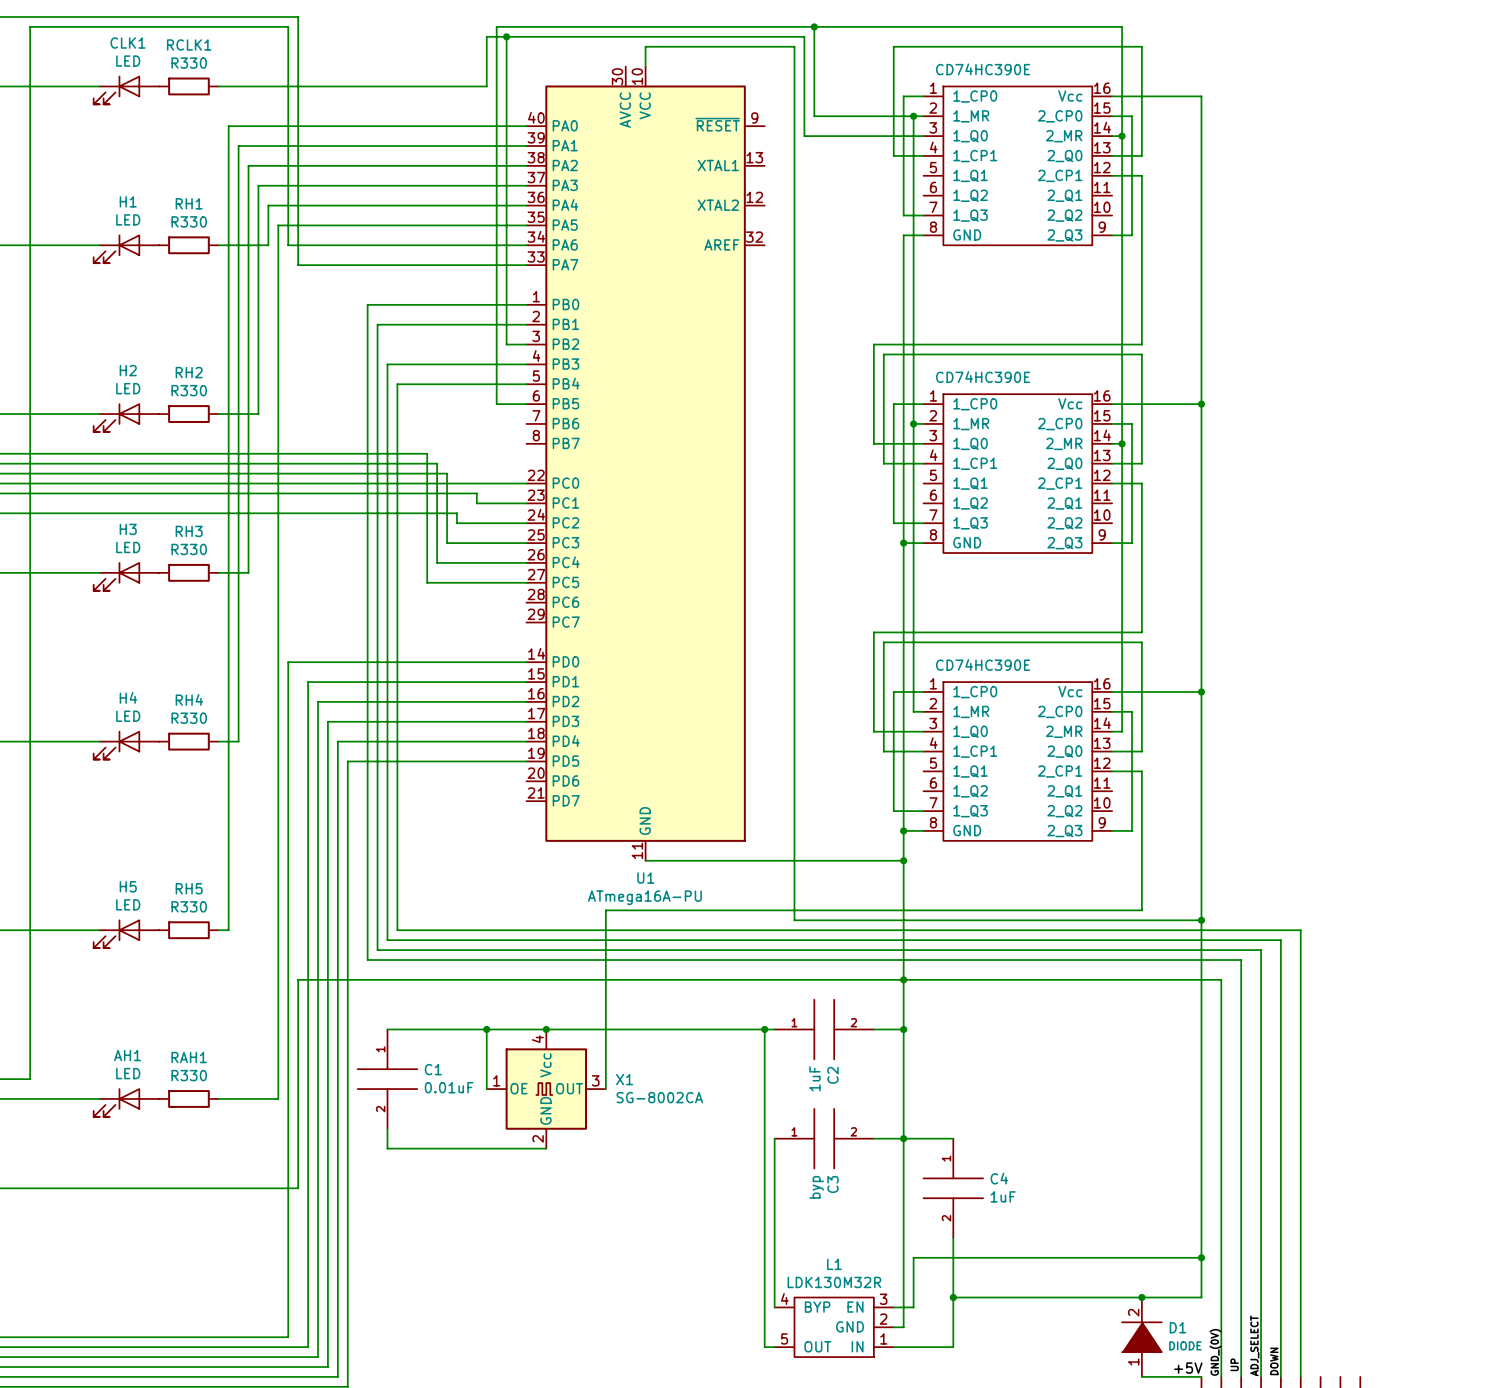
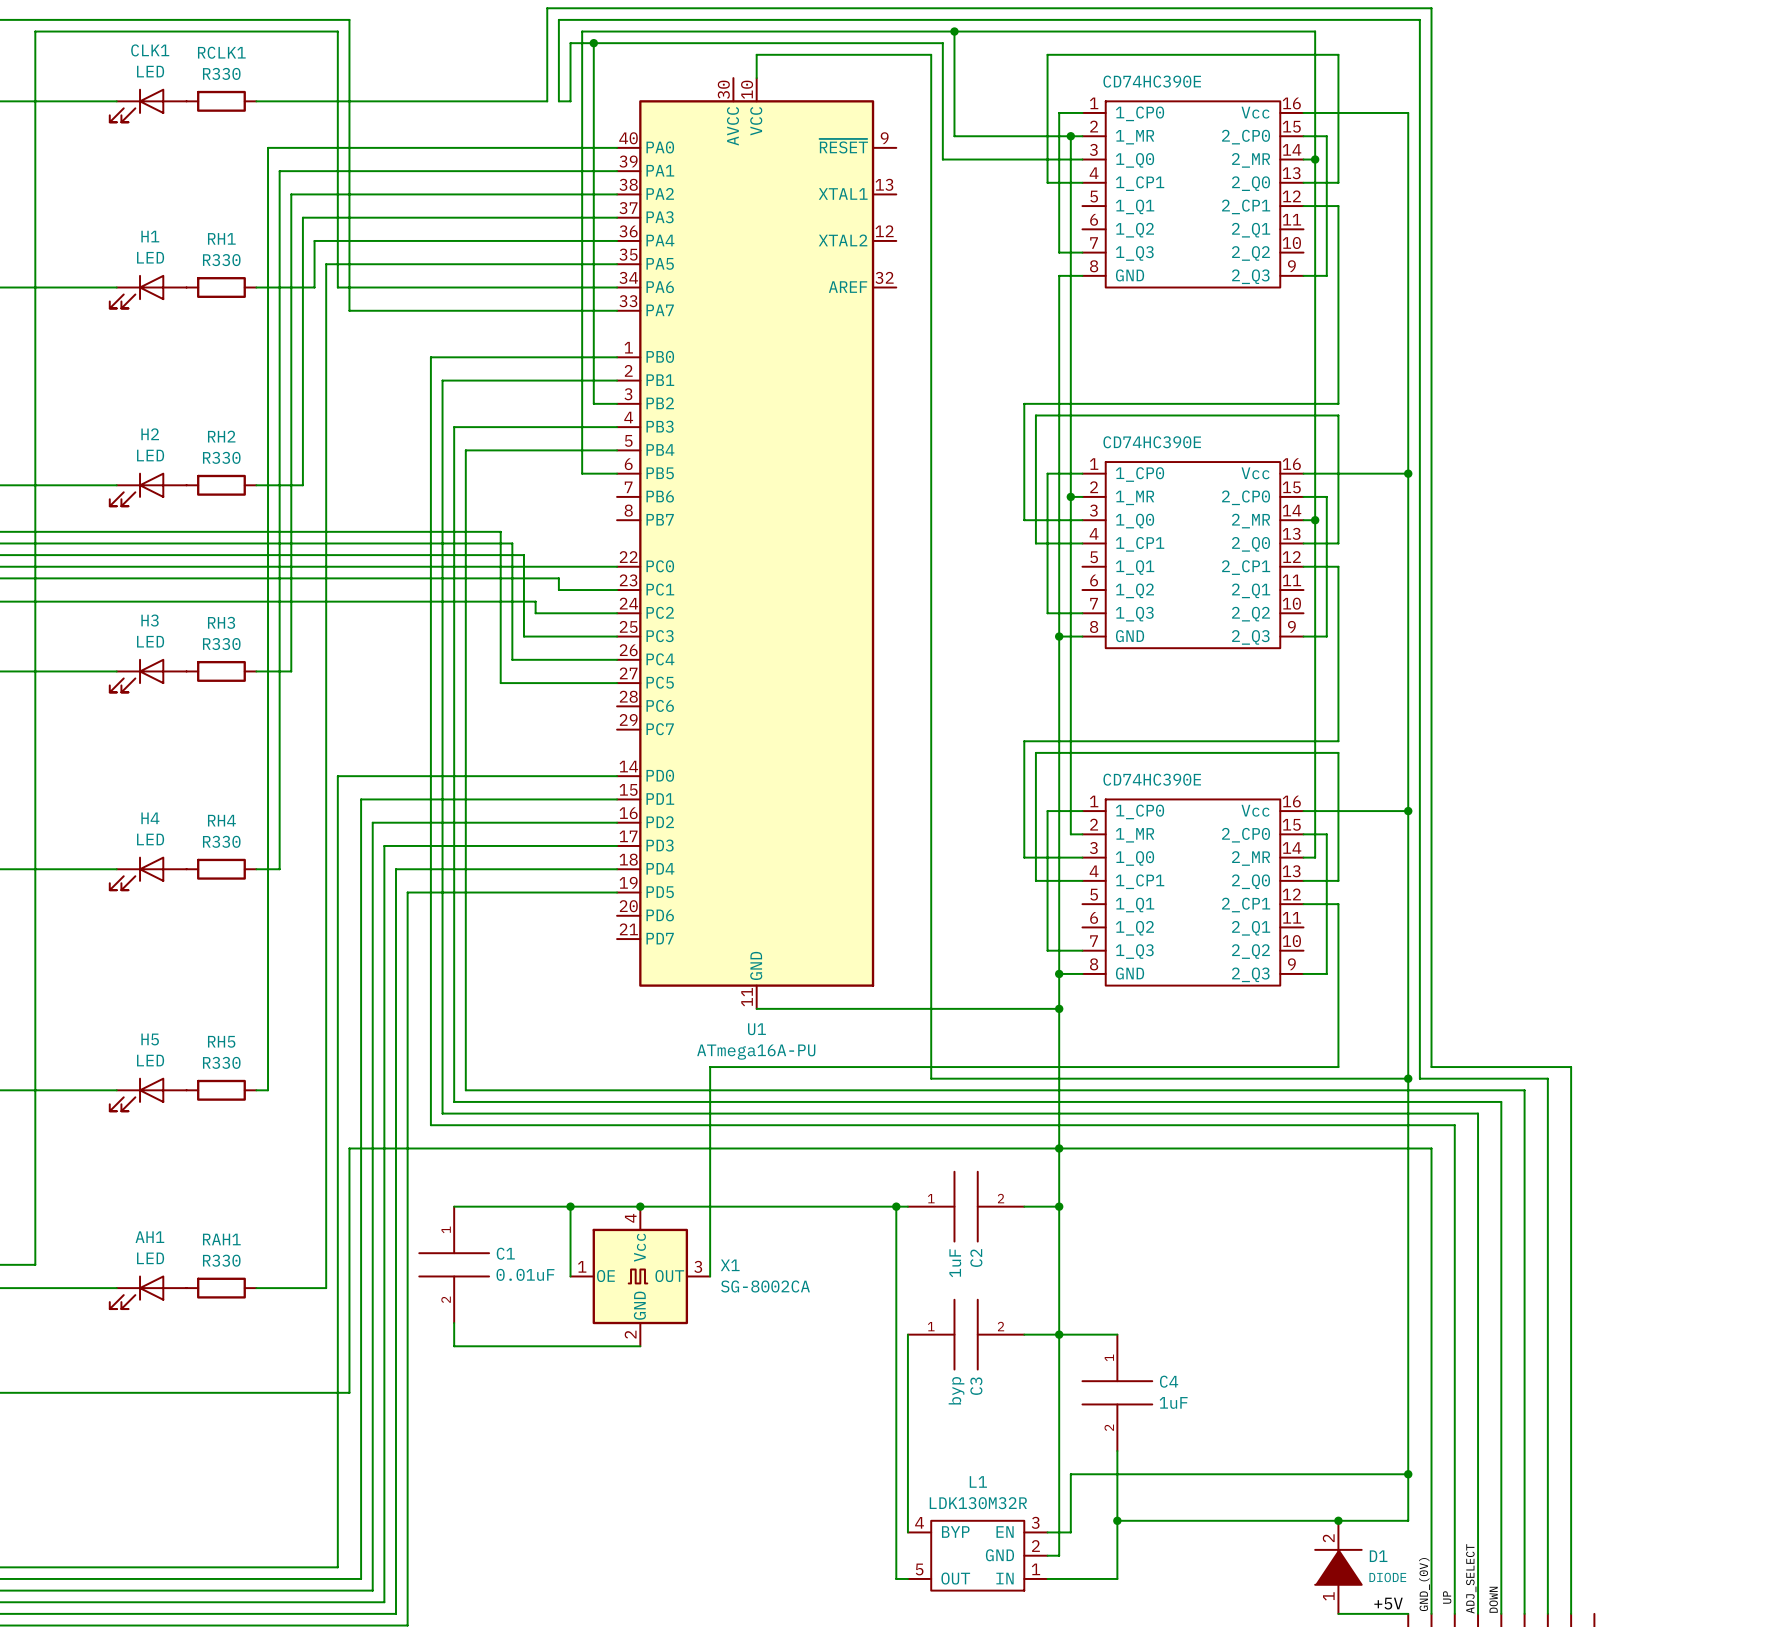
wire: (466, 86) (476, 86) -> (1547, 1613) (1547, 1078) (1419, 1078) (1419, 19) (558, 19) (558, 101)
wire: none -> (547, 101) (547, 8) (1431, 8) (1431, 1067) (1571, 1067) (1571, 1613)

